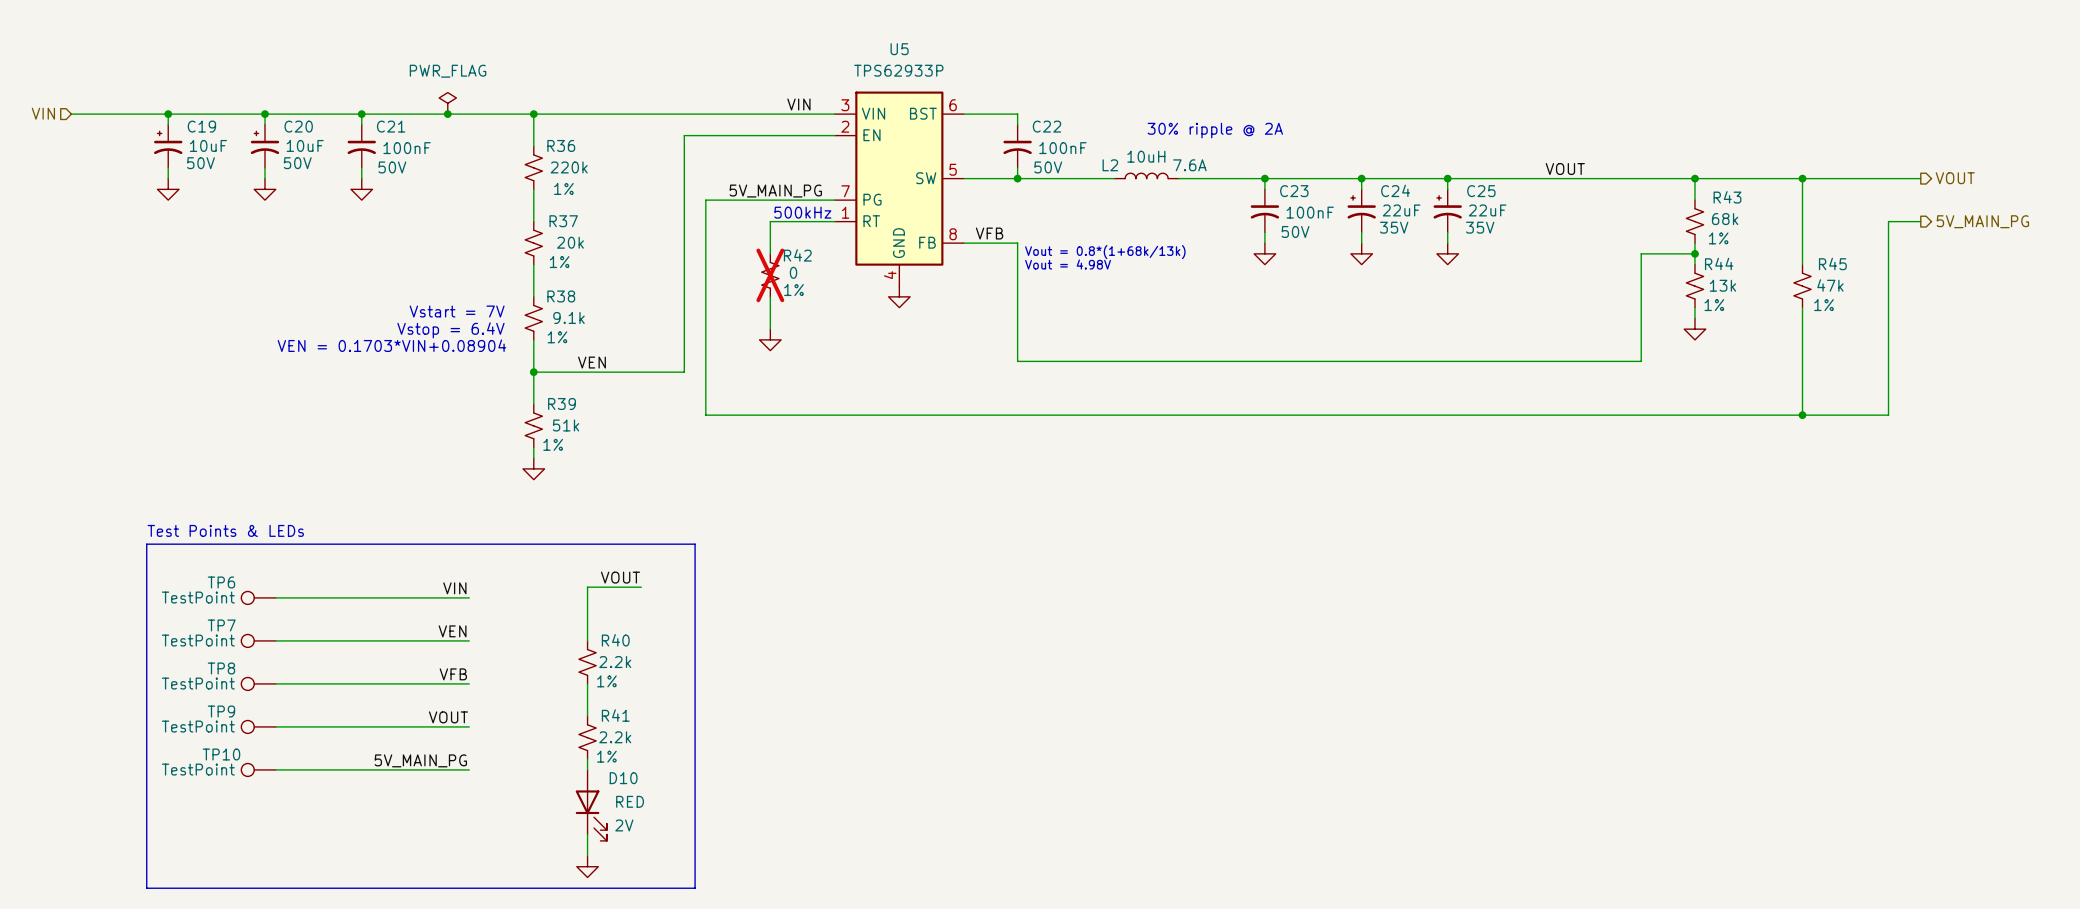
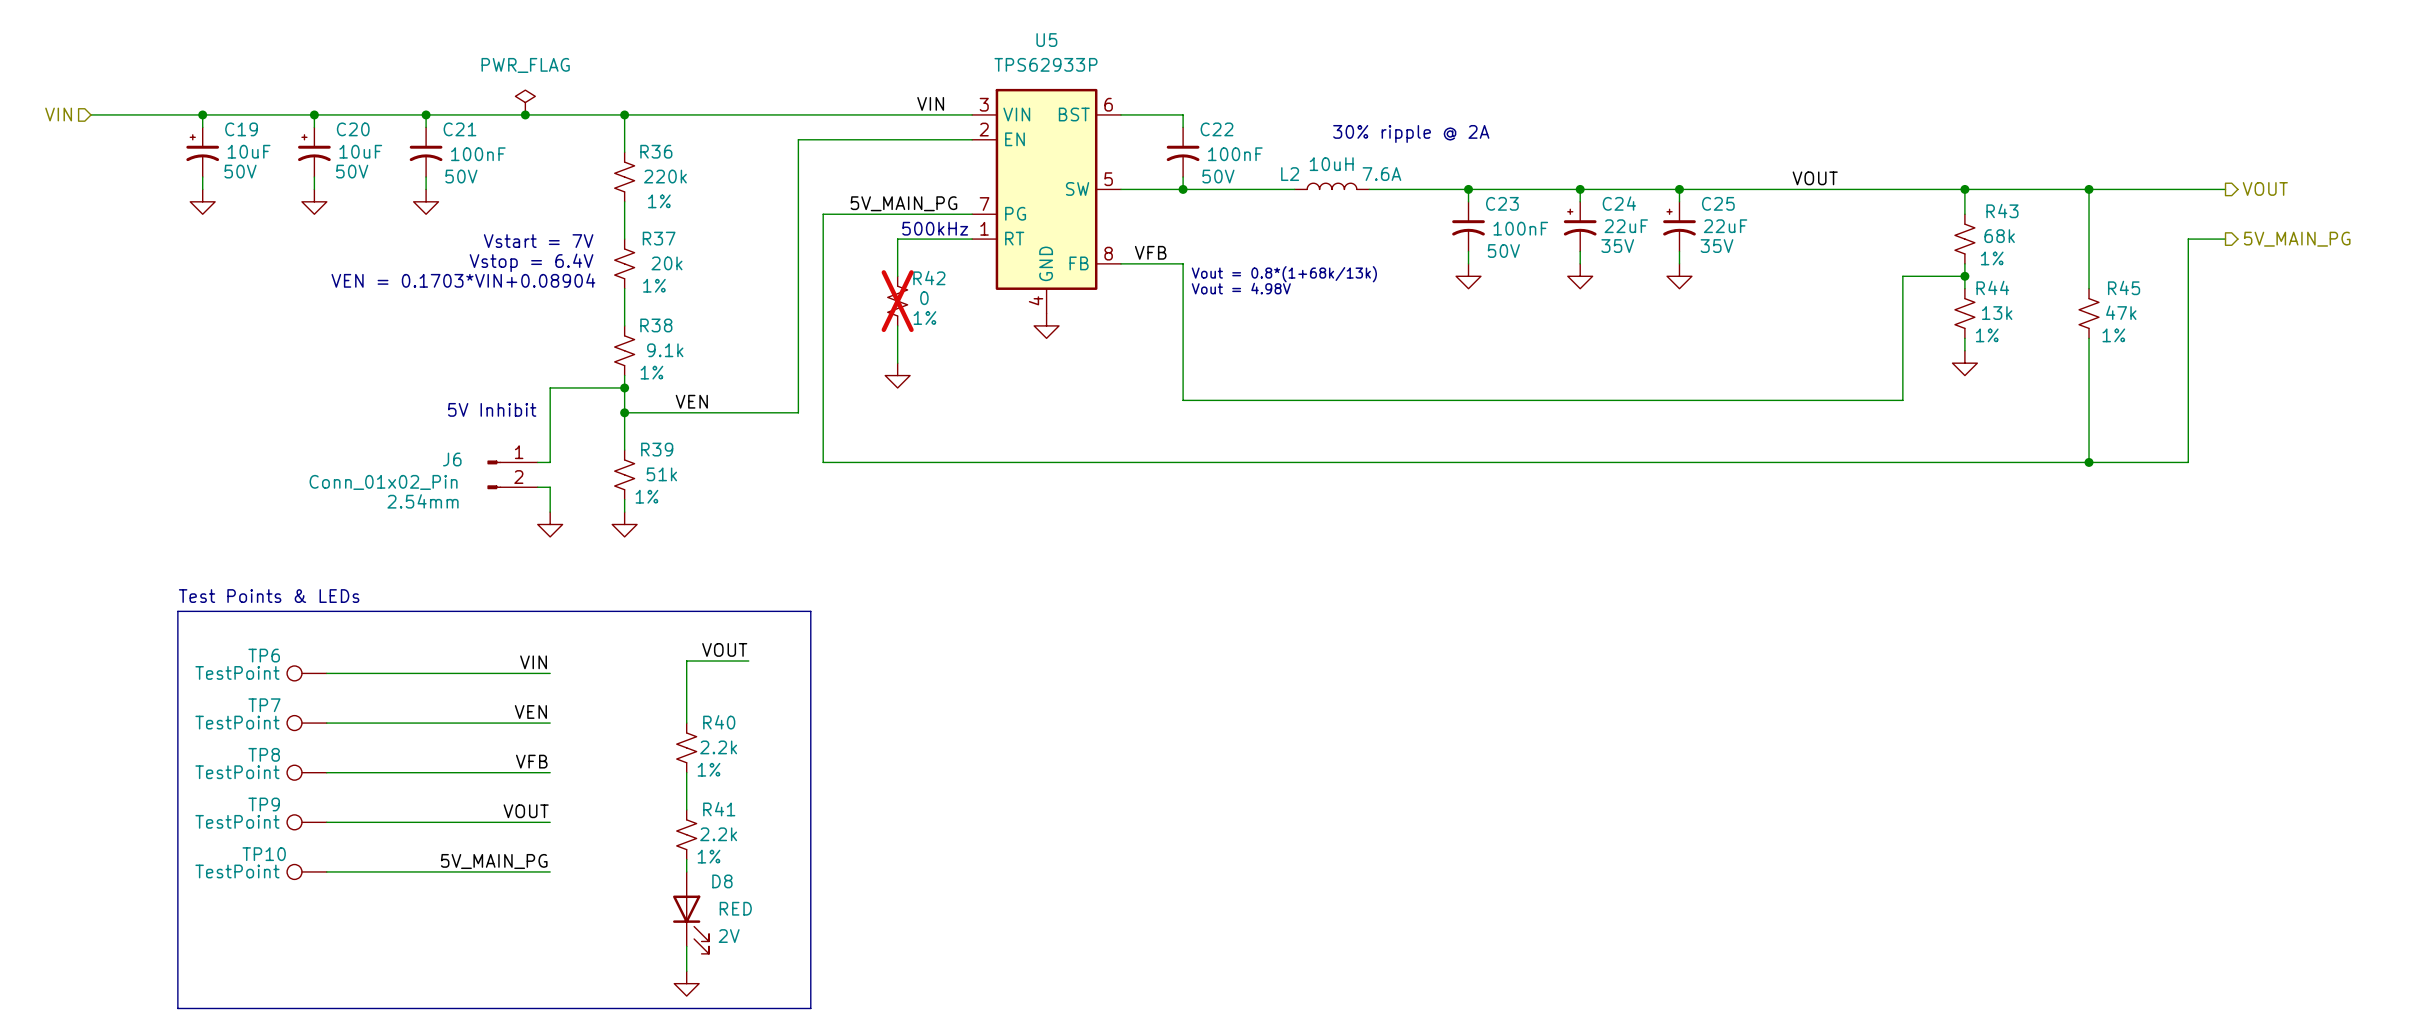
text position: Vstart = 7V (457, 311) -> Vstart = 7V (538, 241)
text position: Vstop = 6.4V (450, 330) -> Vstop = 6.4V (531, 262)
text position: VEN = 0.1703*VIN+0.08904 (391, 345) -> VEN = 0.1703*VIN+0.08904 (463, 280)
wire: none -> (624, 387) (550, 387) (550, 462) (537, 462)
junction: none -> (624, 387)
text: none -> 5V Inhibit (492, 409)
J6: none -> Conn_01x02_Pin (512, 474)
wire: none -> (537, 487) (550, 487) (550, 512)
power symbol: none -> (550, 524)
D10 name: D10 (623, 778) -> D8 (722, 881)

